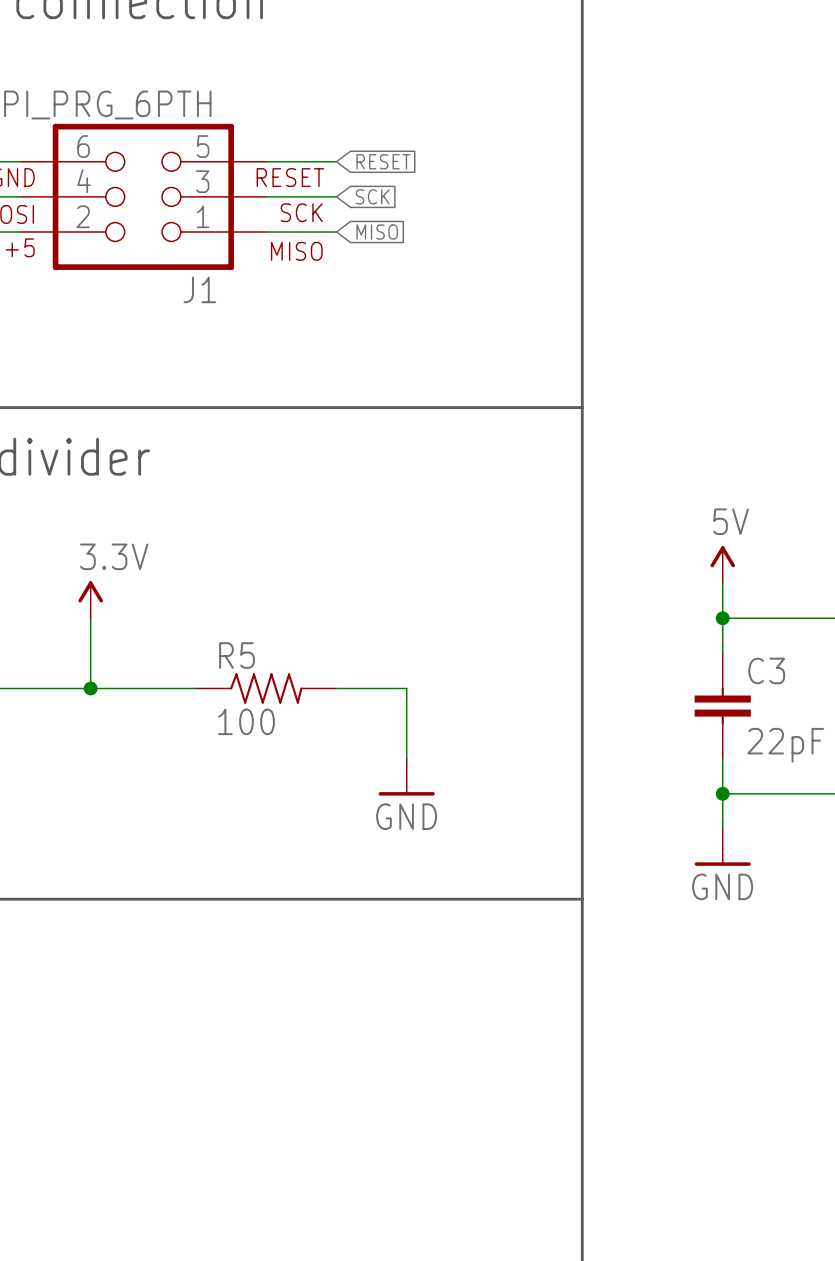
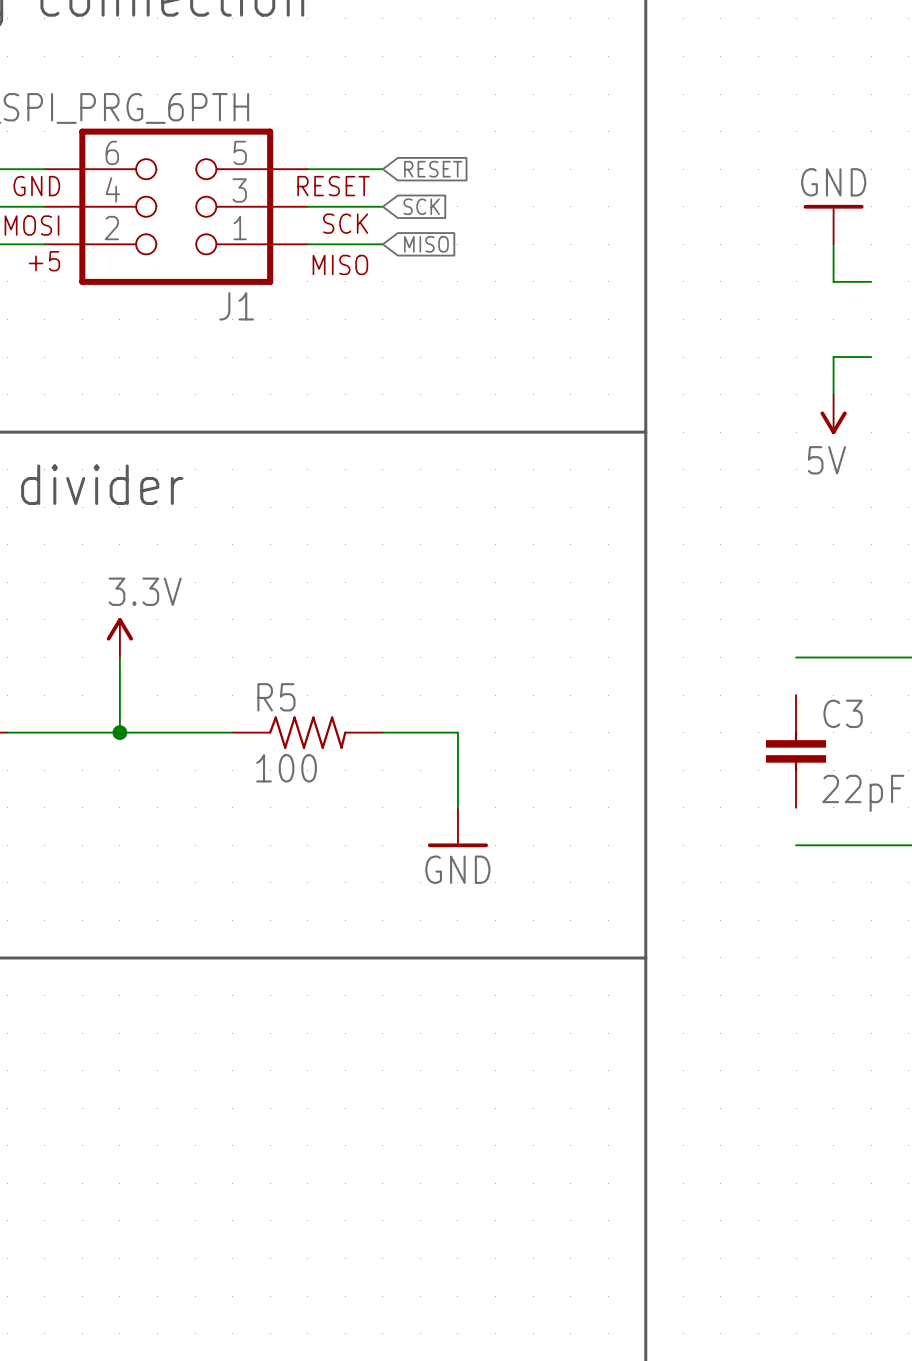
power symbol: none -> GND (833, 224)
wire: none -> (833, 244) (833, 281) (871, 281)
wire: none -> (871, 357) (833, 357) (833, 394)
power symbol: none -> 5V (833, 414)
power symbol: 5V (722, 564) -> none
wire: (722, 583) (722, 653) -> none
junction: (722, 618) -> none
wire: (722, 758) (722, 828) -> none
junction: (722, 793) -> none
power symbol: GND (722, 847) -> none

